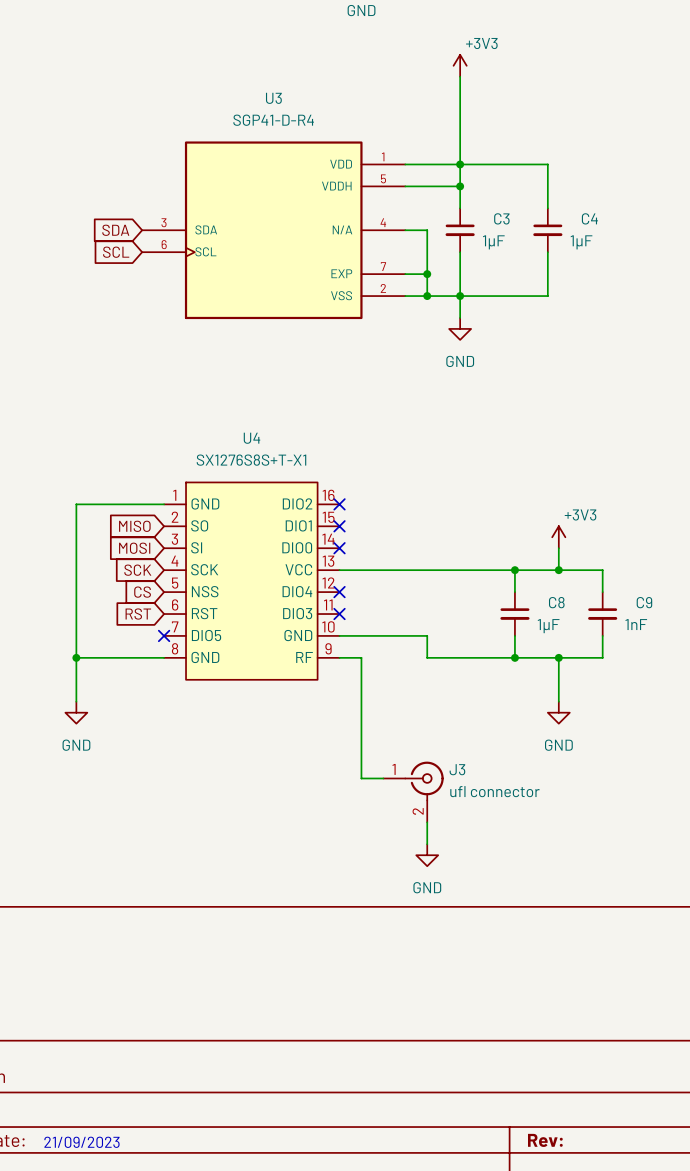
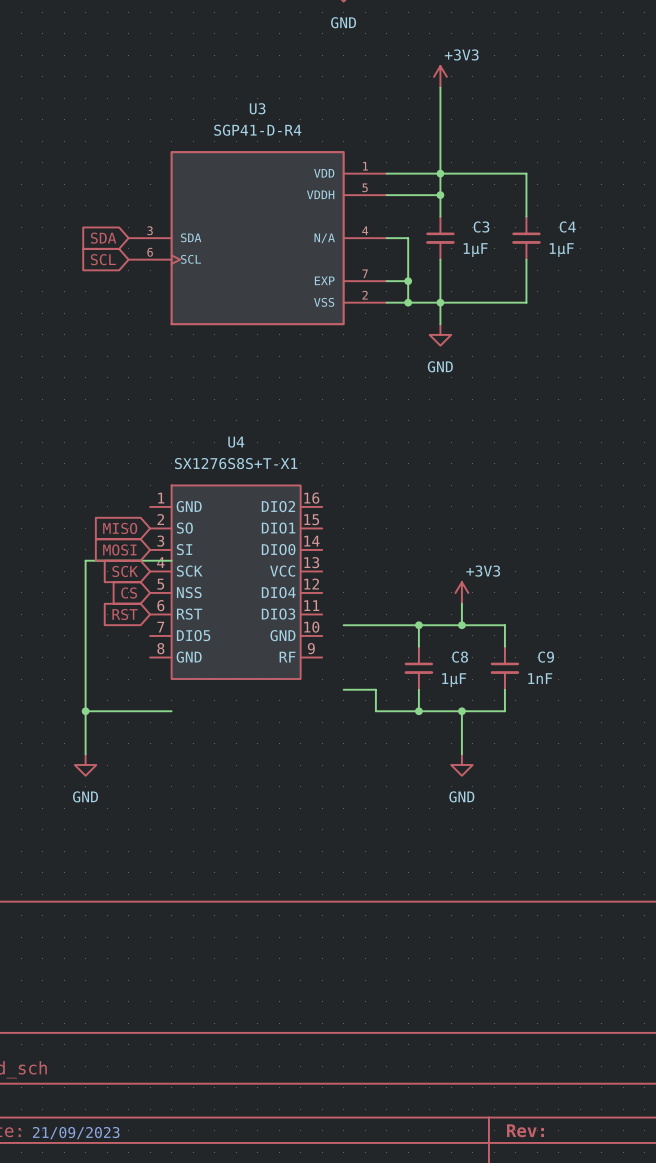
wire: (164, 504) (76, 504) (76, 701) -> (171, 560) (85, 560) (85, 754)
no-connect mark: (339, 504) -> none
no-connect mark: (339, 526) -> none
power symbol position: +3V3 (558, 537) -> +3V3 (461, 592)
no-connect mark: (339, 548) -> none
wire: (558, 548) (558, 570) -> (461, 603) (461, 625)
wire: (339, 570) (602, 570) (602, 592) -> none
wire: (514, 570) (514, 592) -> (418, 625) (418, 646)
junction: (514, 570) -> none
junction: (558, 570) -> none
no-connect mark: (339, 592) -> none
no-connect mark: (339, 614) -> none
C8 position: (514, 614) -> (418, 668)
C9 position: (602, 614) -> (504, 668)
wire: none -> (343, 625) (504, 625) (504, 646)
junction: none -> (418, 625)
junction: none -> (461, 625)
no-connect mark: (164, 635) -> none
wire: (339, 635) (427, 635) (427, 657) (602, 657) (602, 635) -> none
wire: (514, 635) (514, 657) -> (418, 689) (418, 711)
wire: (76, 657) (164, 657) -> (85, 711) (171, 711)
junction: (76, 657) -> none
wire: (339, 657) (361, 657) (361, 778) (383, 778) -> none
junction: (514, 657) -> none
wire: (558, 657) (558, 701) -> (461, 711) (461, 754)
junction: (558, 657) -> none
wire: none -> (343, 689) (375, 689) (375, 711) (504, 711) (504, 689)
power symbol position: GND (76, 712) -> GND (85, 765)
junction: none -> (85, 711)
junction: none -> (418, 711)
junction: none -> (461, 711)
power symbol: GND (558, 712) -> none
power symbol: none -> GND (461, 765)
J3: ufl connector (413, 791) -> none
wire: (427, 822) (427, 844) -> none
power symbol: GND (427, 855) -> none

